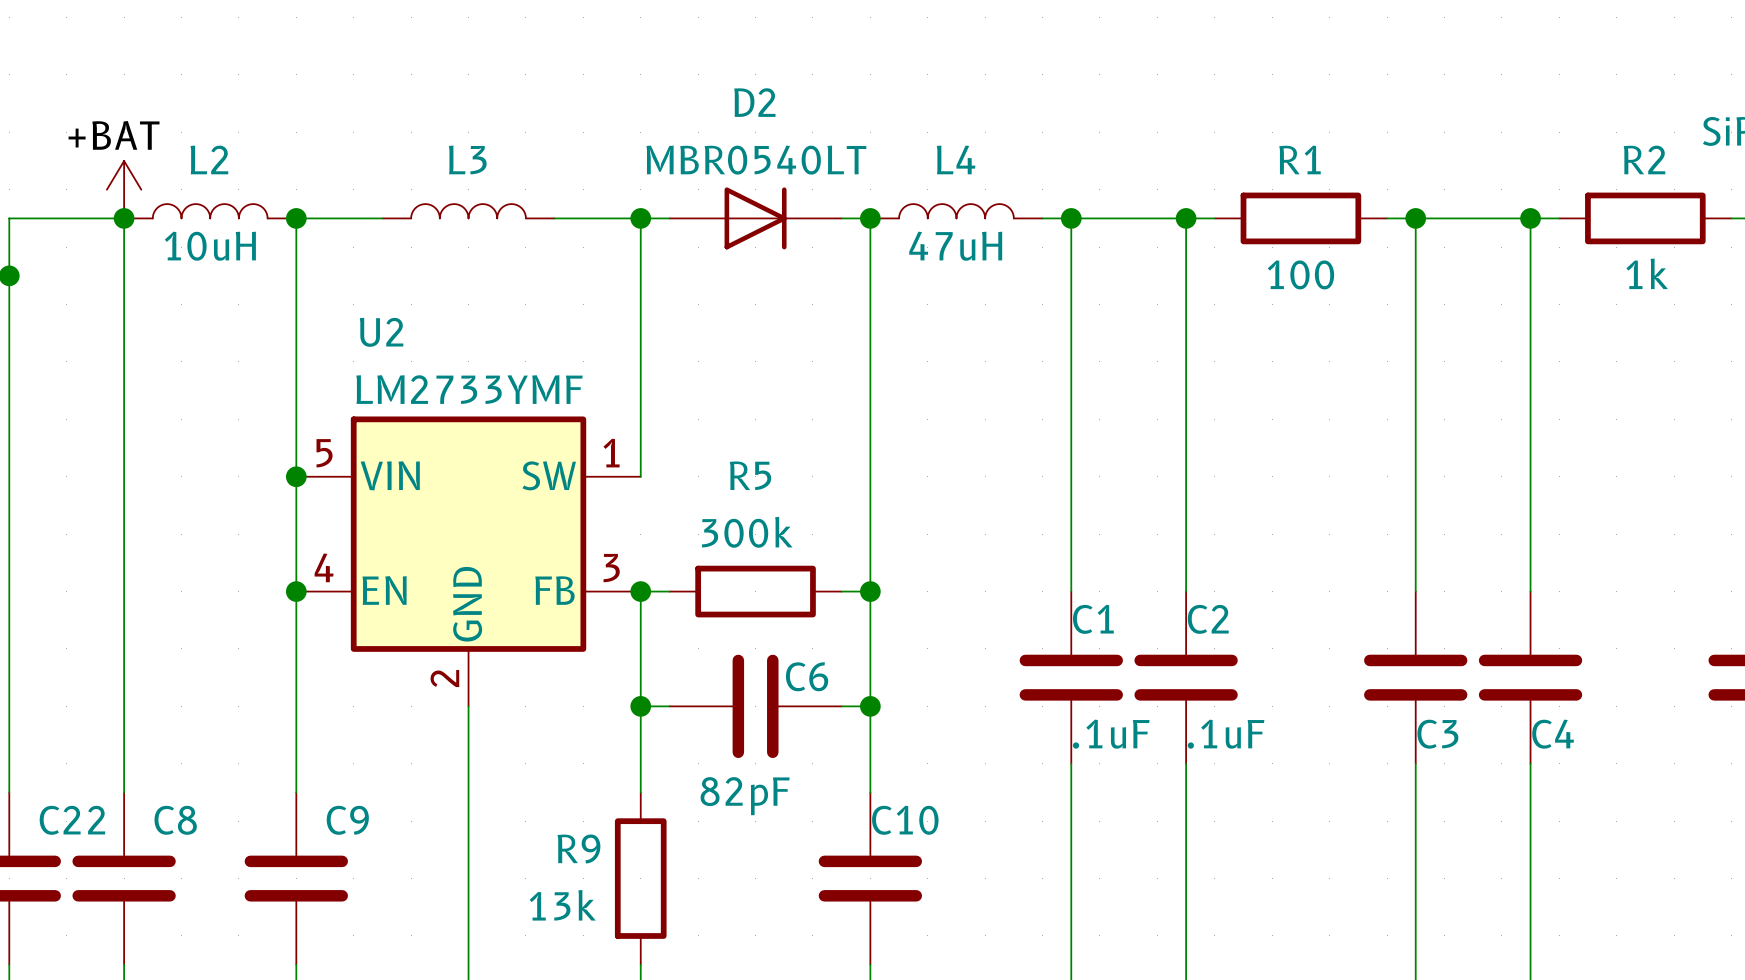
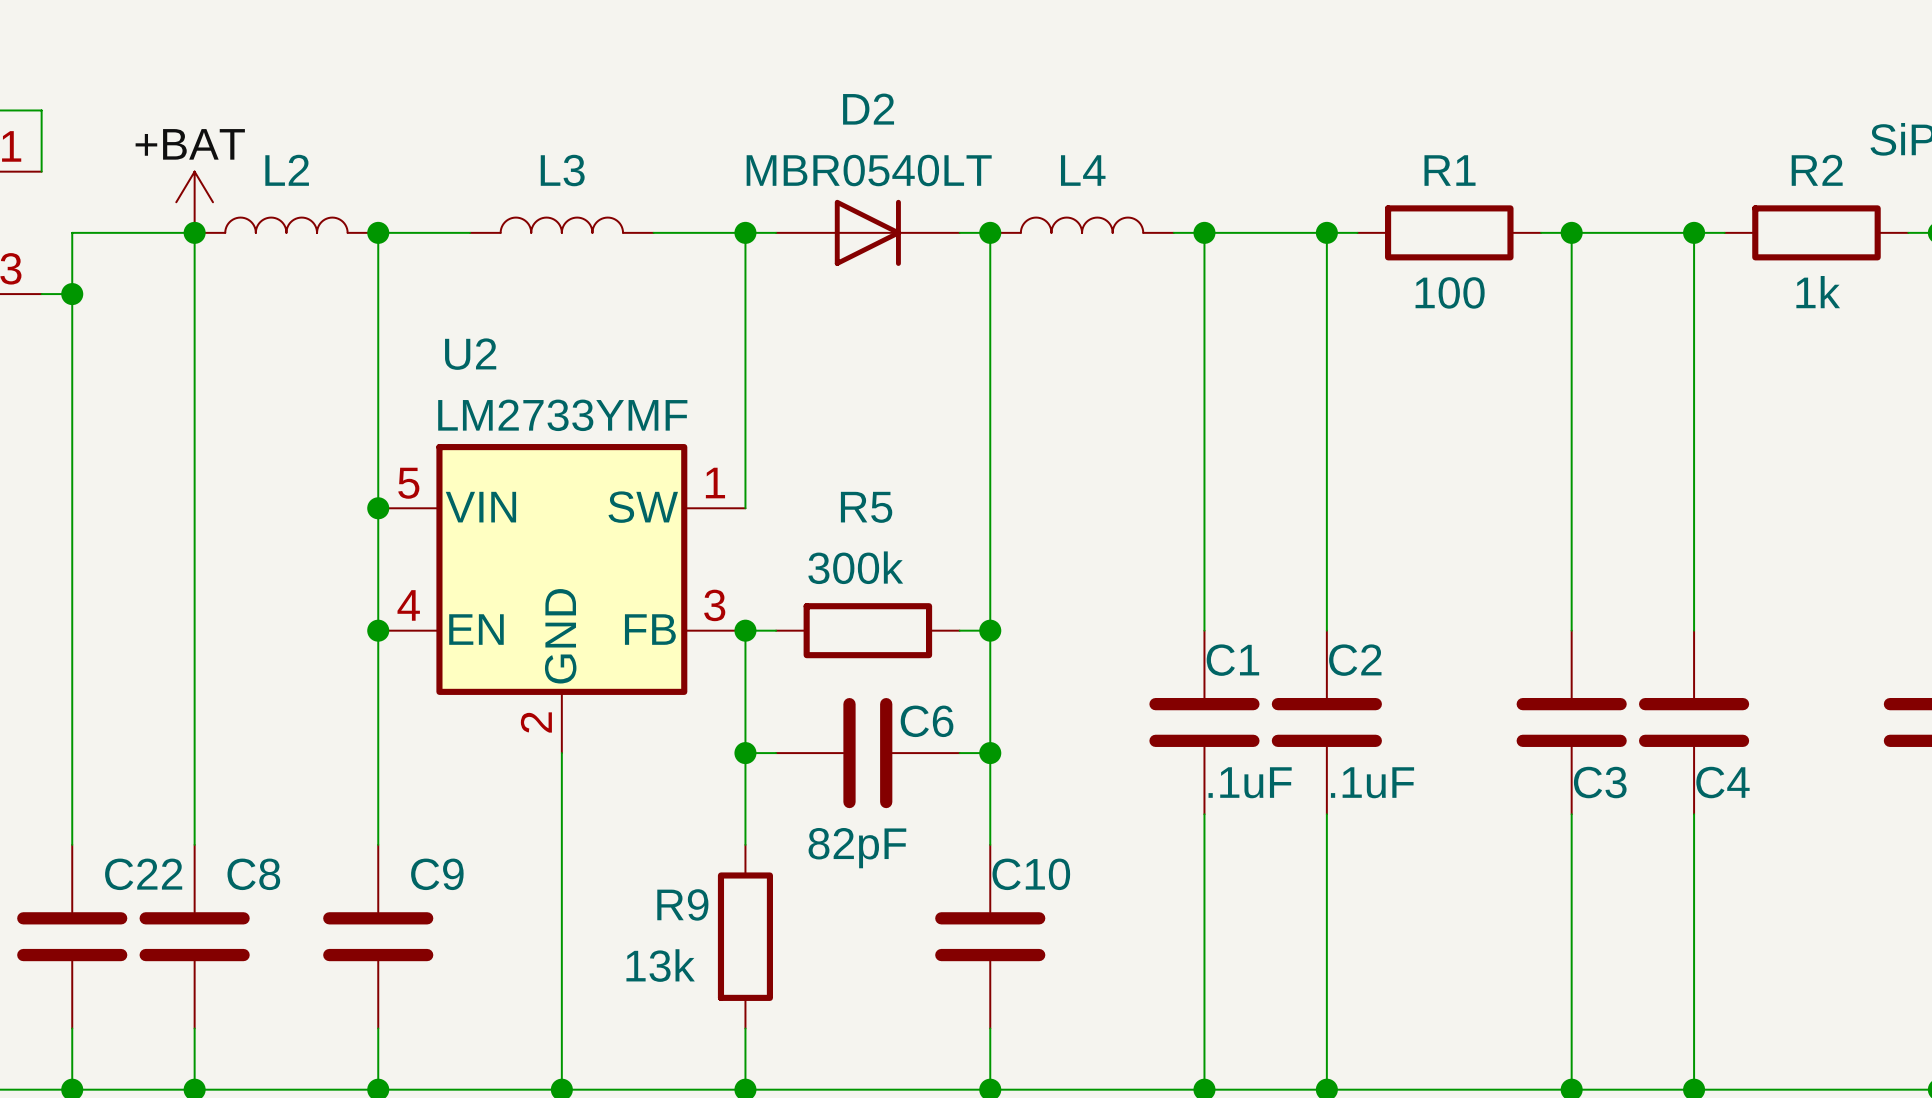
L2 value: 10uH (210, 246) -> none
L4 value: 47uH (955, 246) -> none

